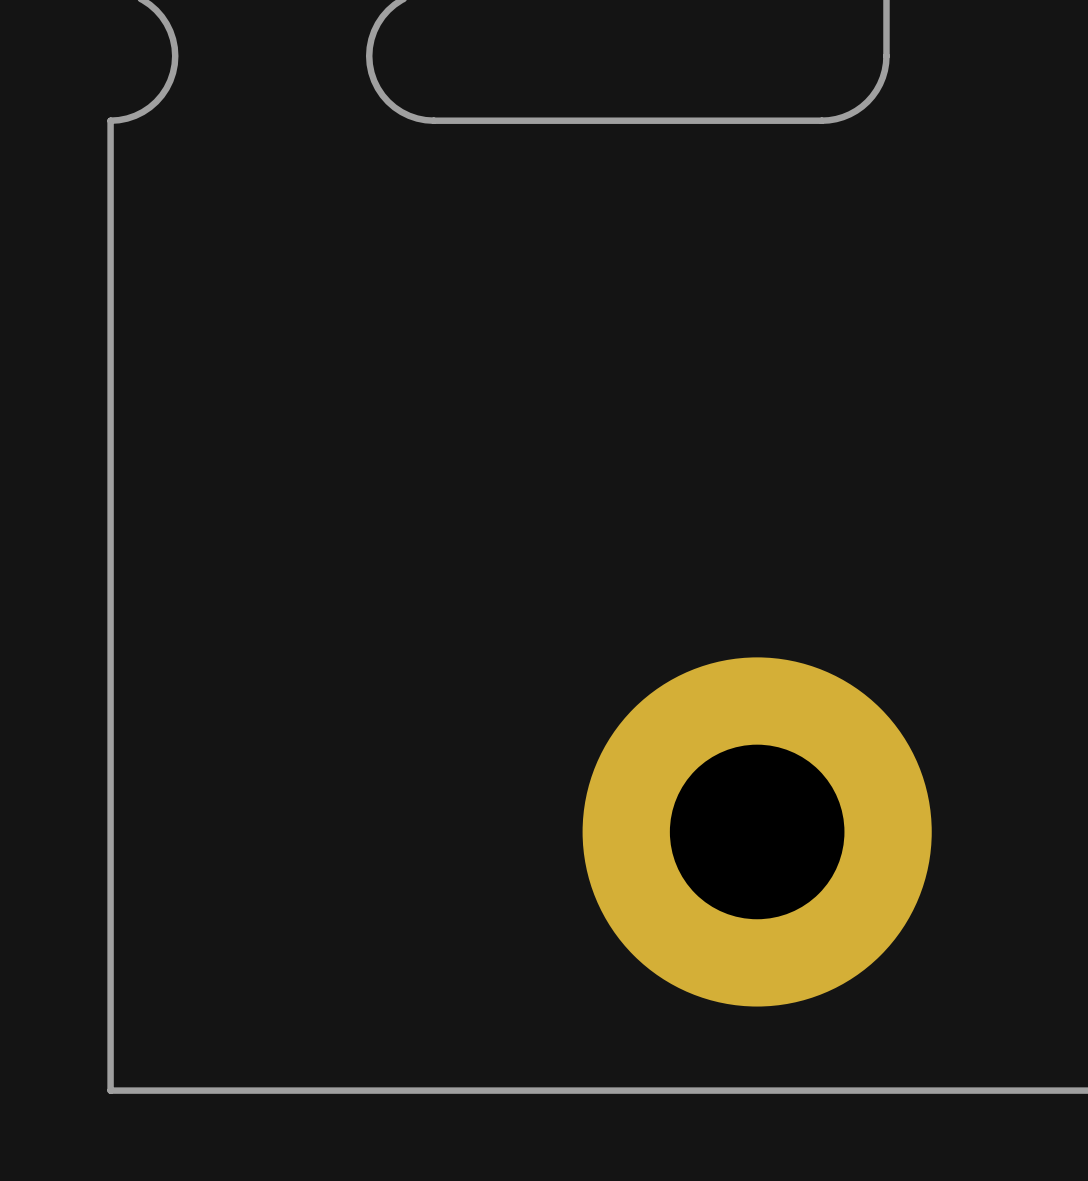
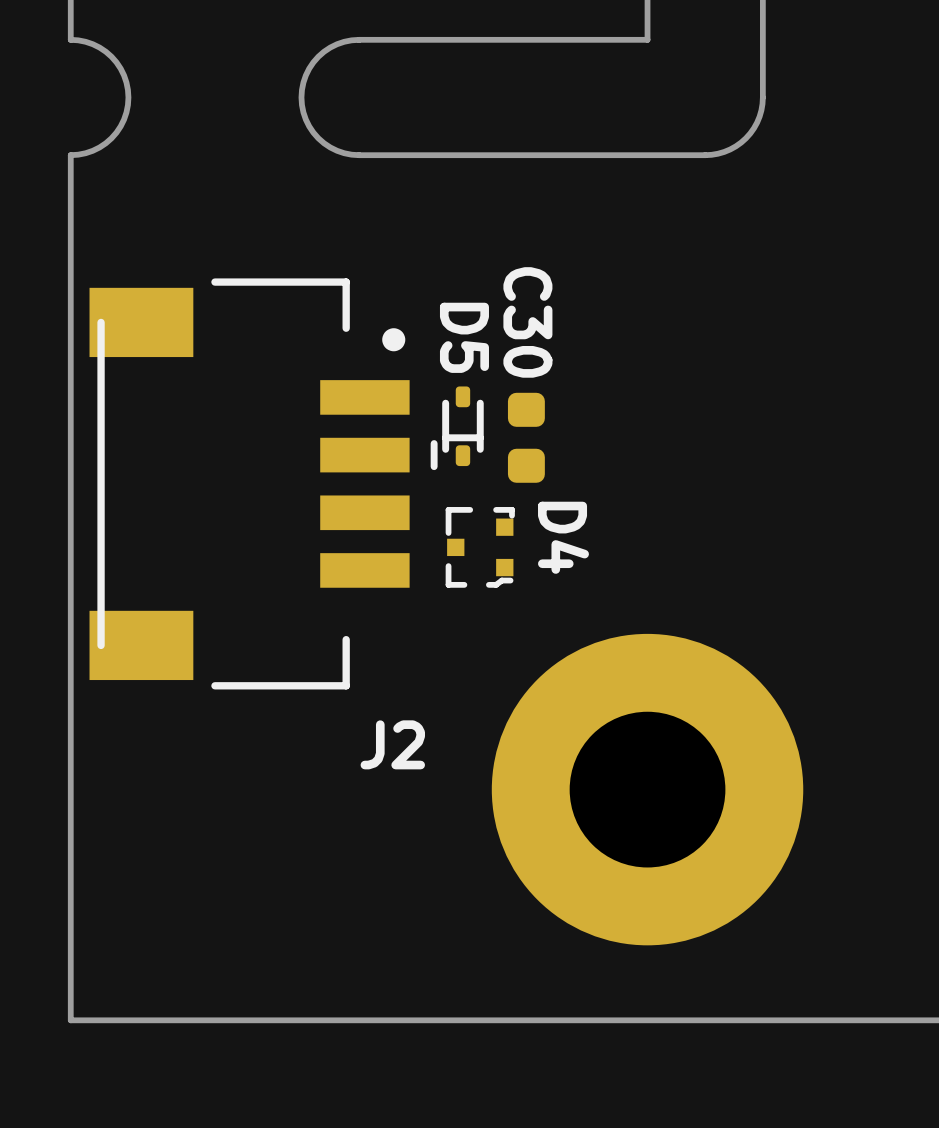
D5: none -> (457, 428)
C30: none -> (526, 437)
J2: none -> (249, 483)
D4: none -> (480, 547)

